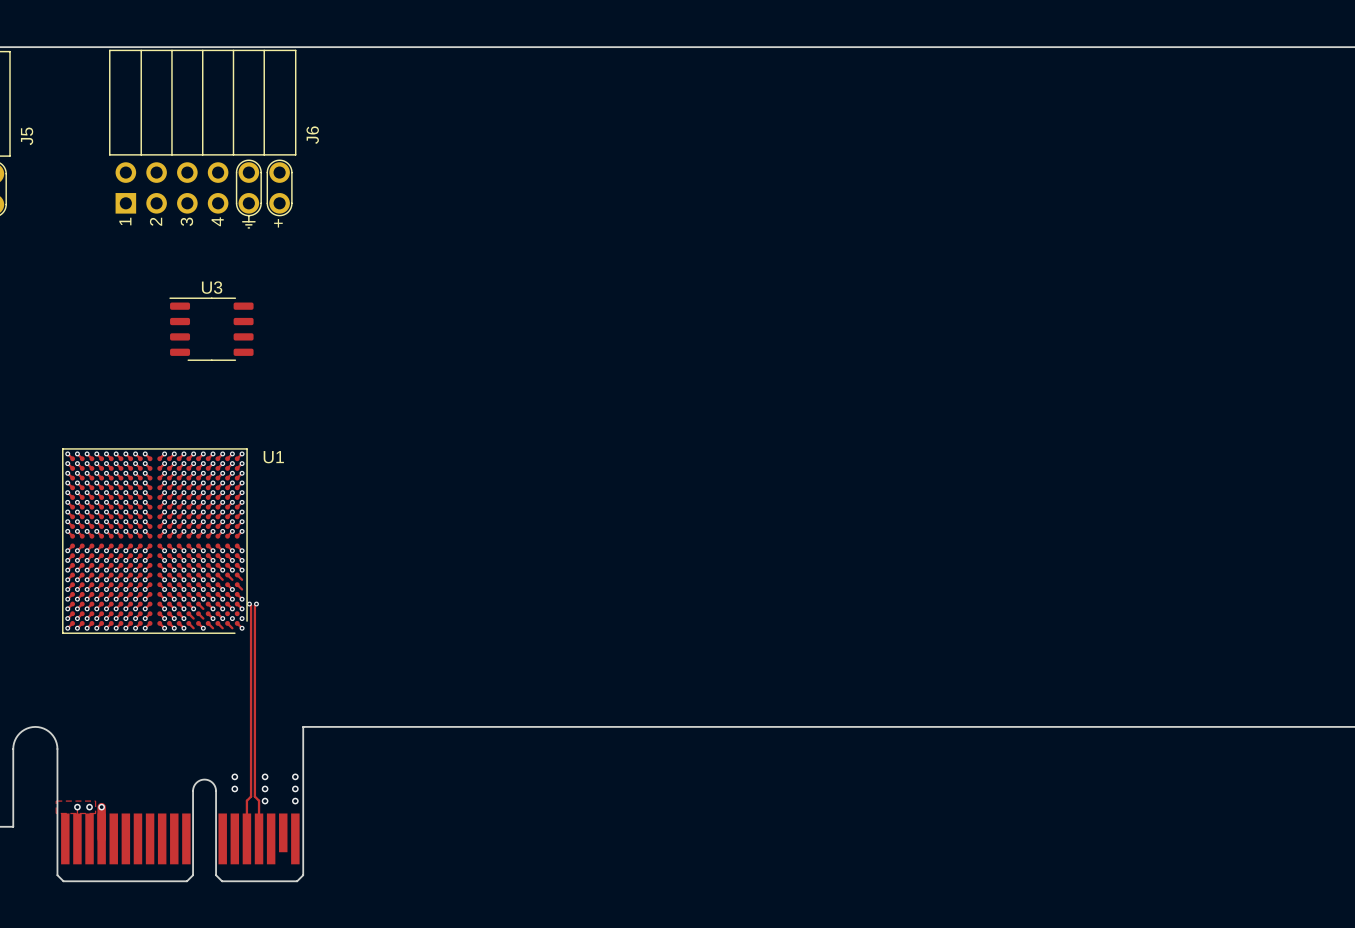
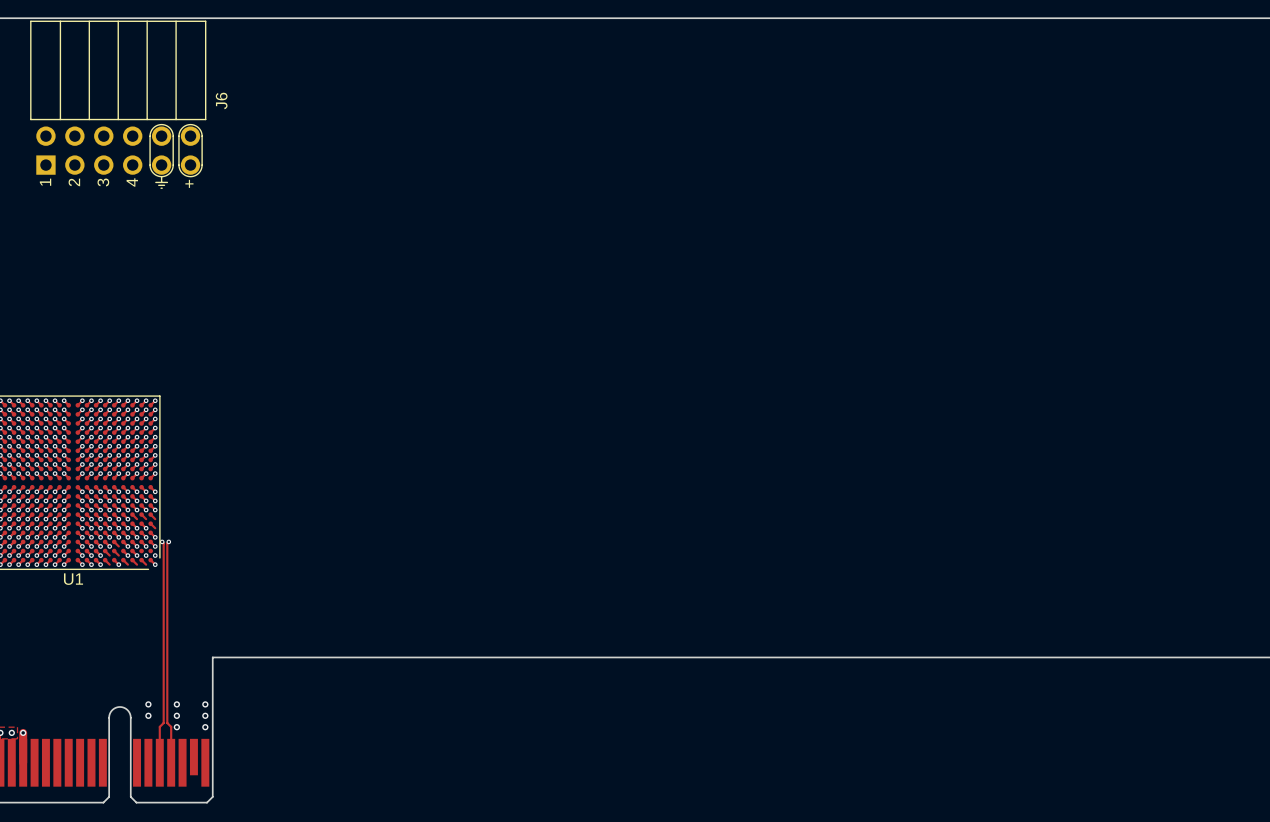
U3: (211, 329) -> none
U1 name position: U1 (273, 457) -> U1 (73, 579)

